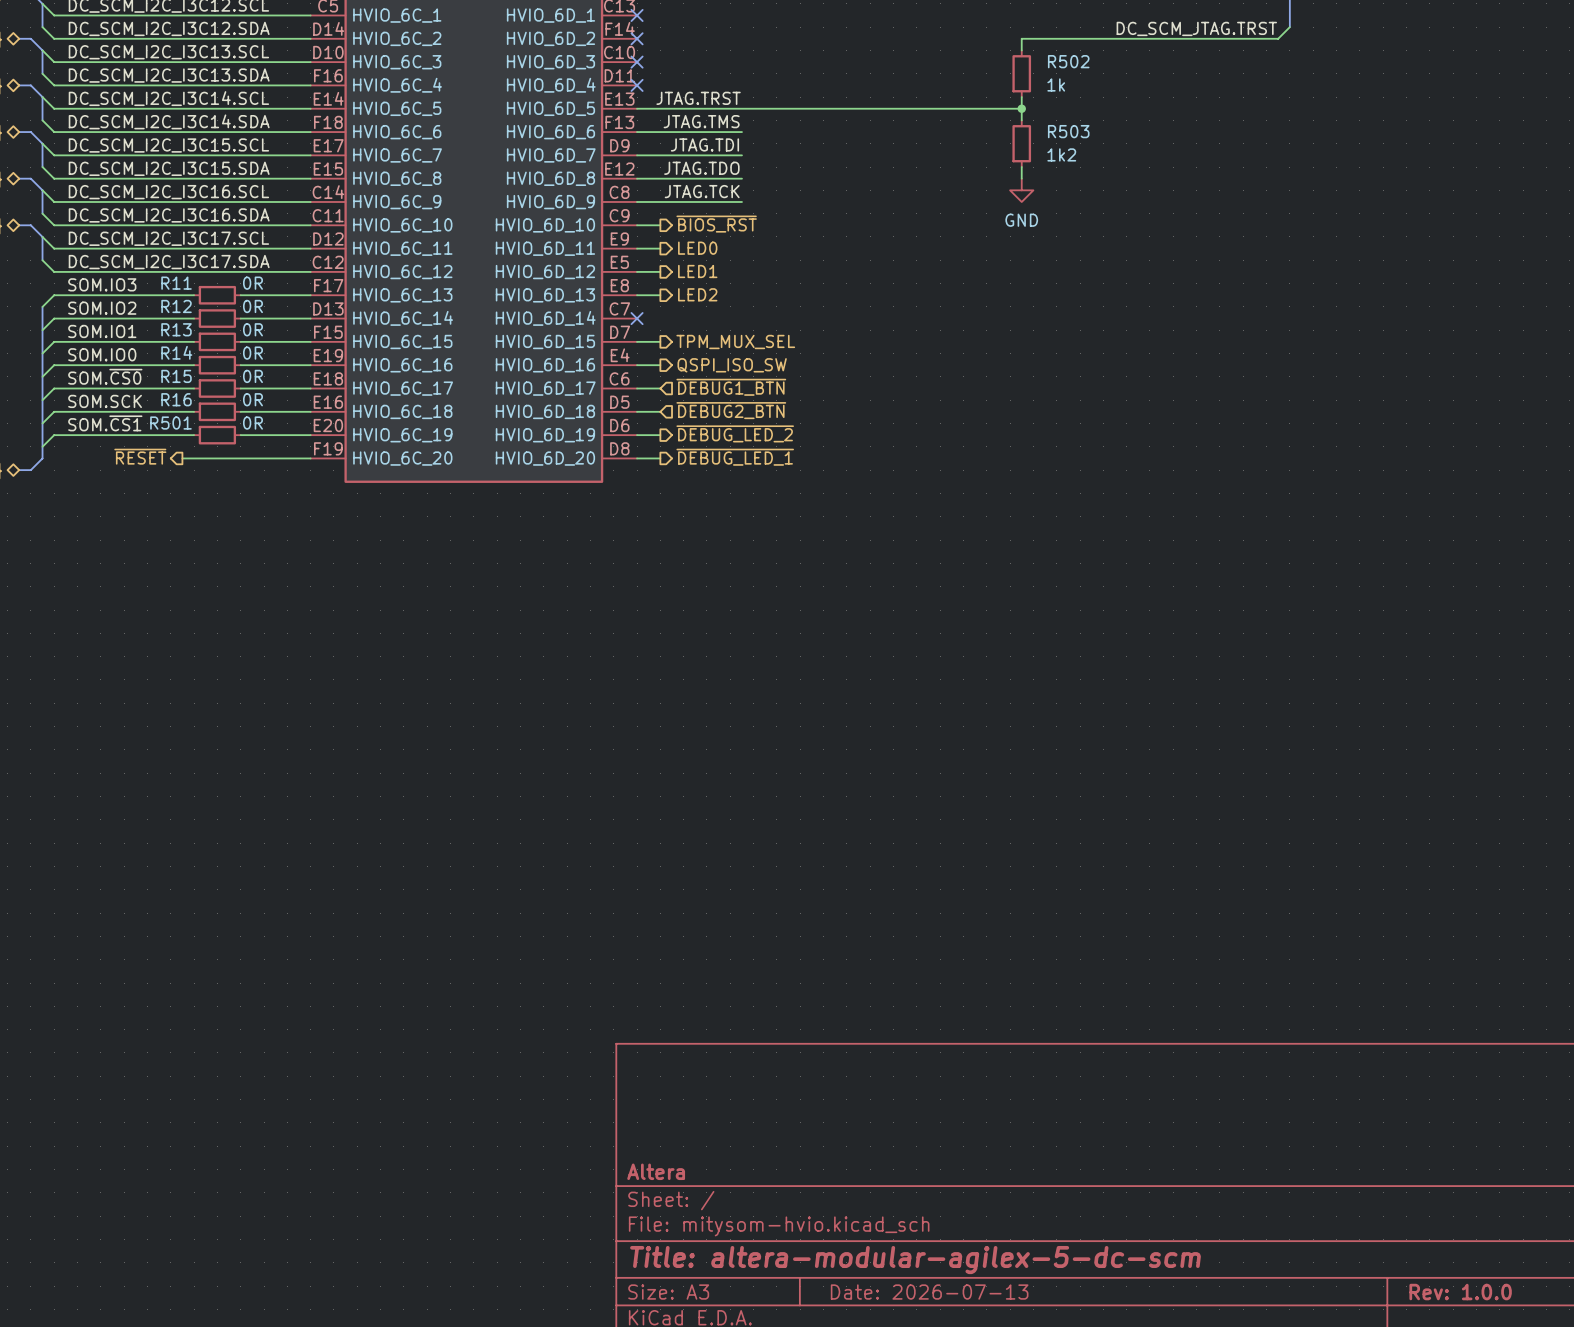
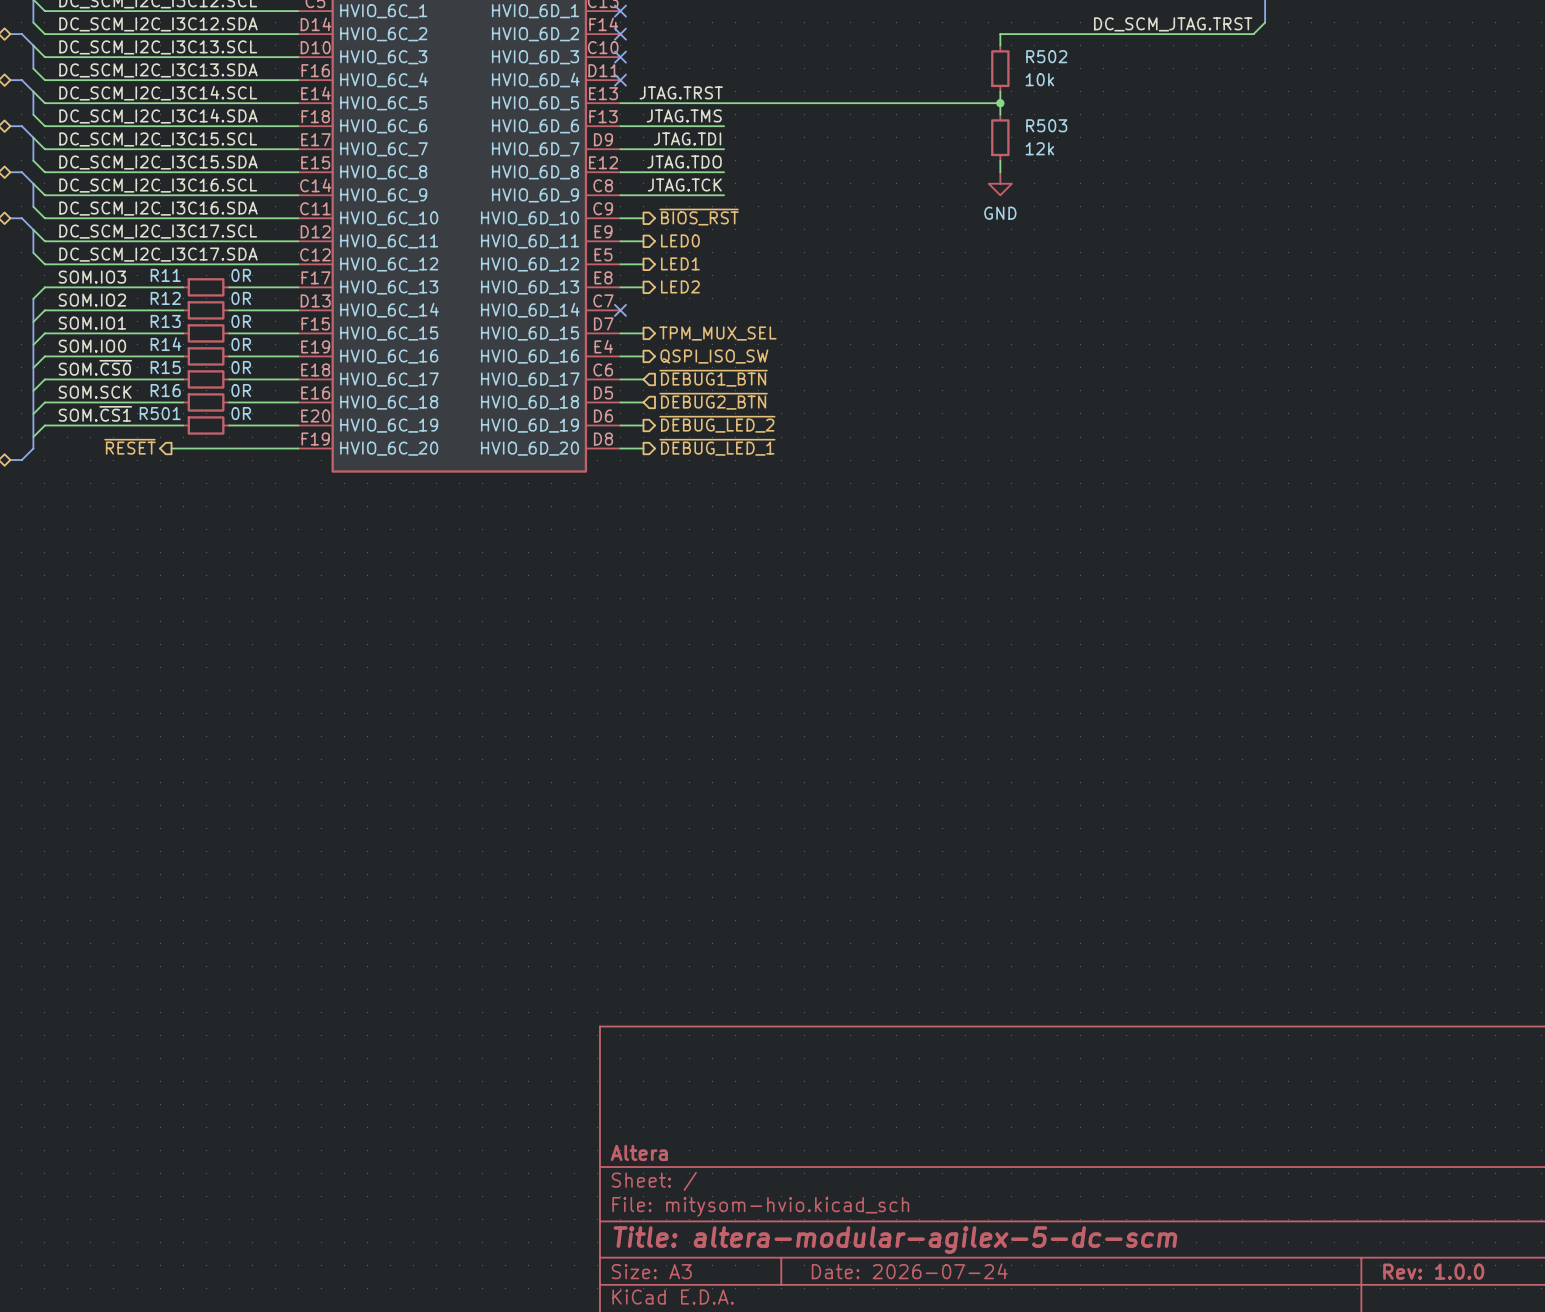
R502 text: 1k (1056, 84) -> 10k (1039, 79)
R503 text: 1k2 (1061, 154) -> 12k (1039, 148)
title block: Date: 2026-07-13 (929, 1292) -> Date: 2026-07-24 (909, 1271)

